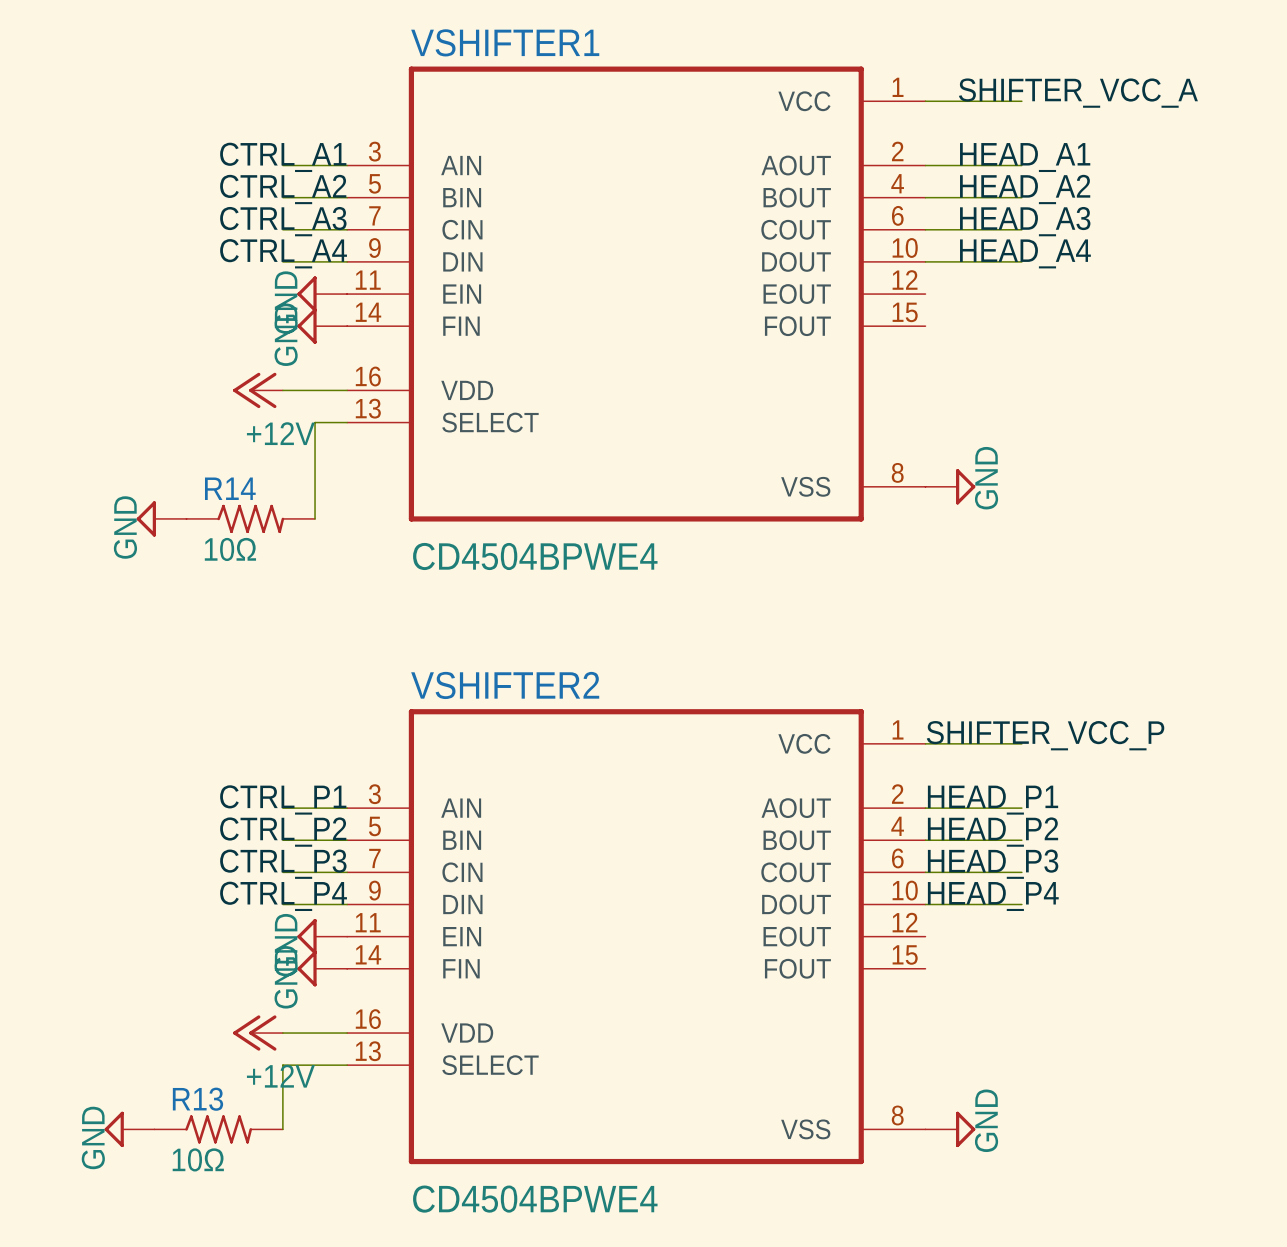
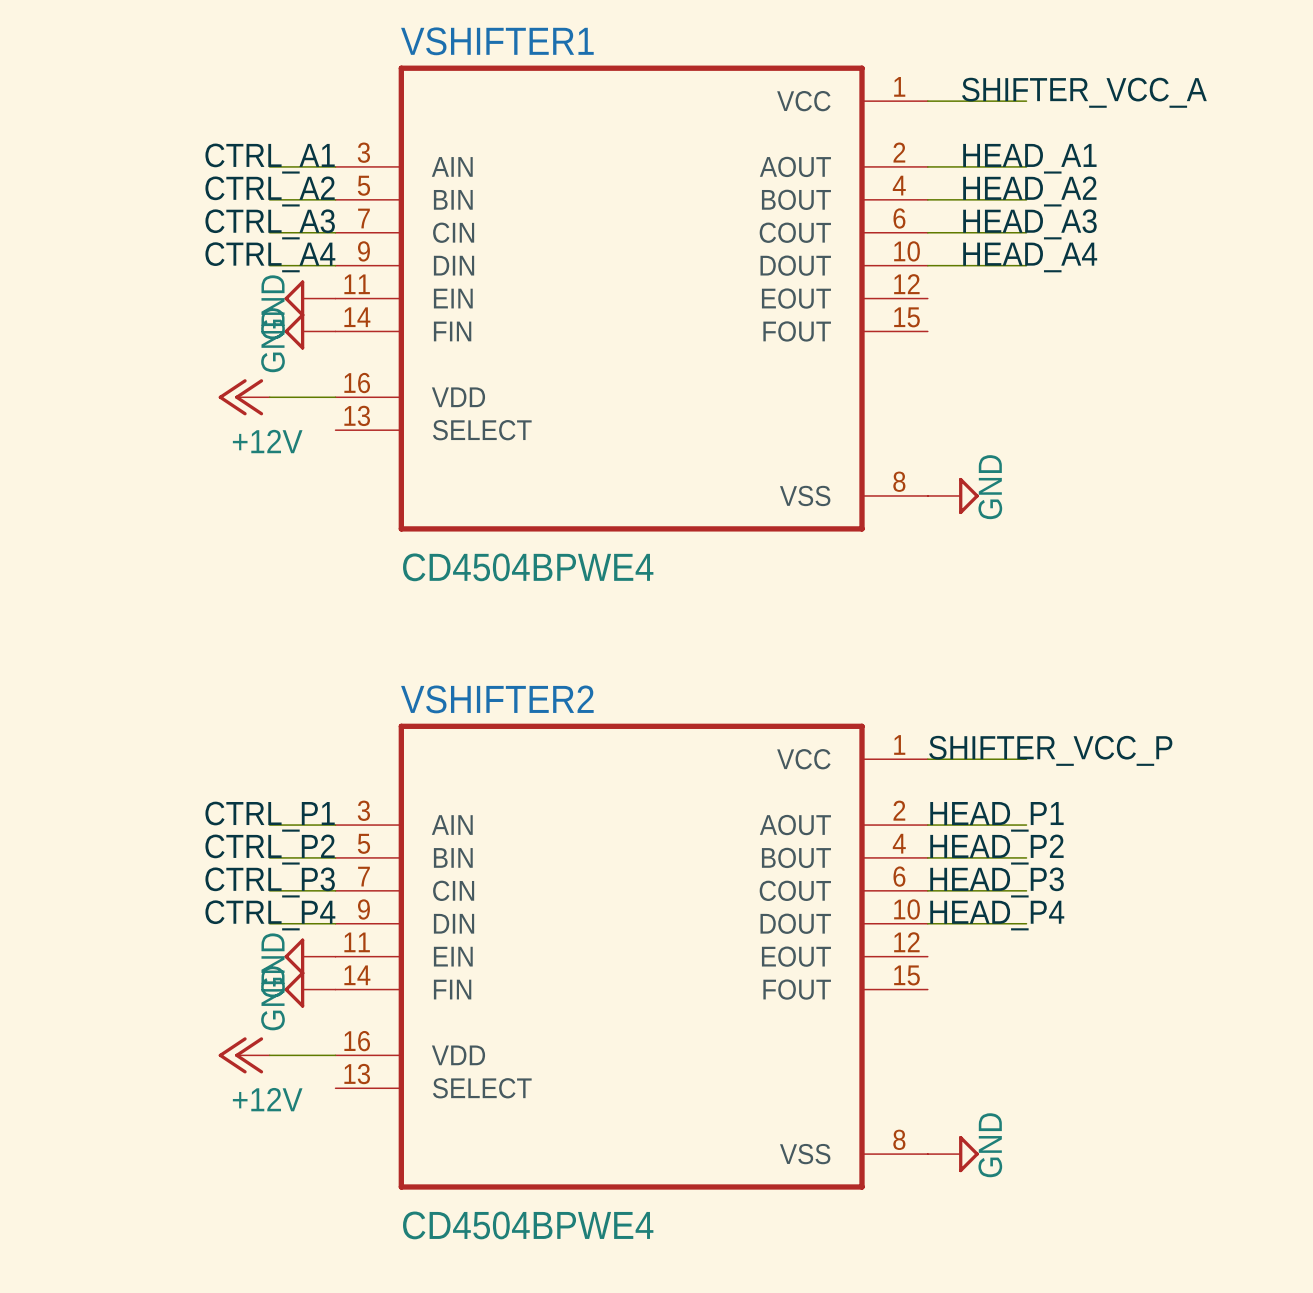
wire: (347, 422) (315, 422) (315, 518) -> none
power symbol: GND (161, 518) -> none
R14: 10Ω (250, 518) -> none
wire: (347, 1065) (282, 1065) (282, 1129) -> none
power symbol: GND (129, 1129) -> none
R13: 10Ω (218, 1129) -> none

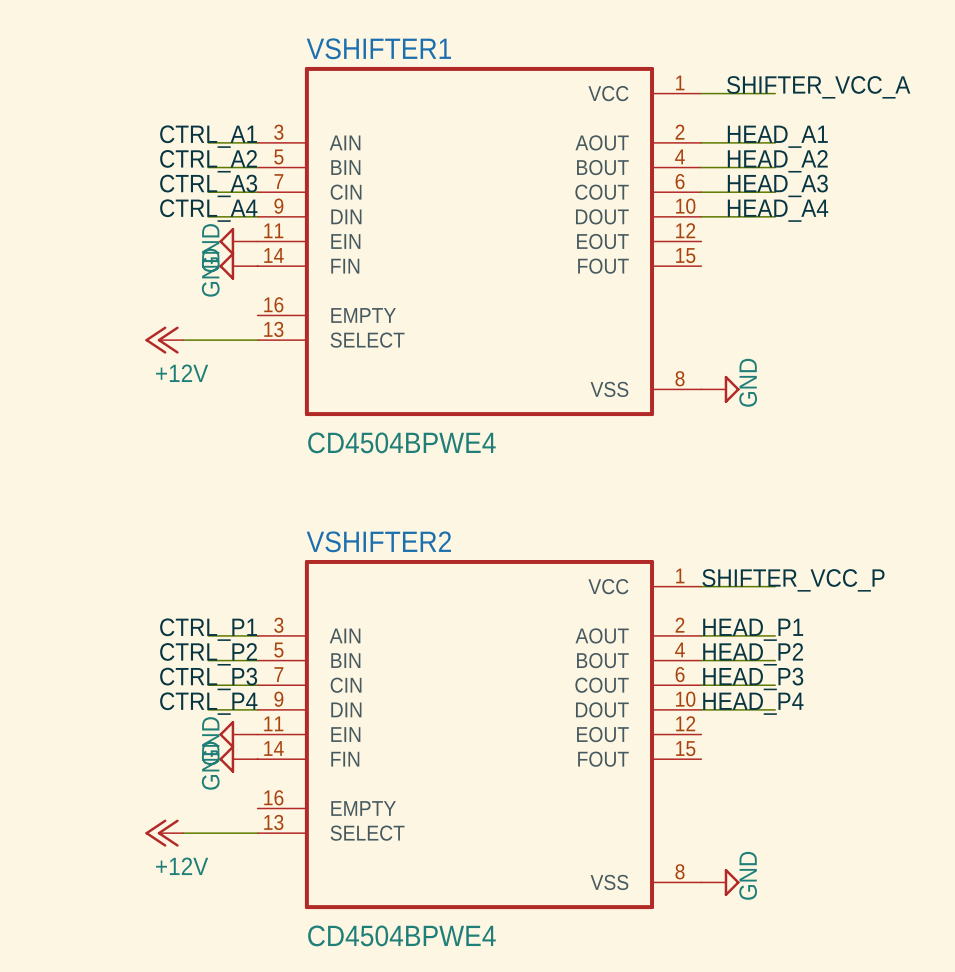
power symbol position: +12V (244, 397) -> +12V (164, 340)
wire: (269, 397) (335, 397) -> none
VSHIFTER1 pin name: VDD (458, 397) -> EMPTY (363, 315)
wire: none -> (183, 340) (257, 340)
power symbol position: +12V (244, 1055) -> +12V (164, 833)
wire: (269, 1055) (335, 1055) -> none
VSHIFTER2 pin name: VDD (458, 1055) -> EMPTY (363, 808)
wire: none -> (183, 833) (257, 833)

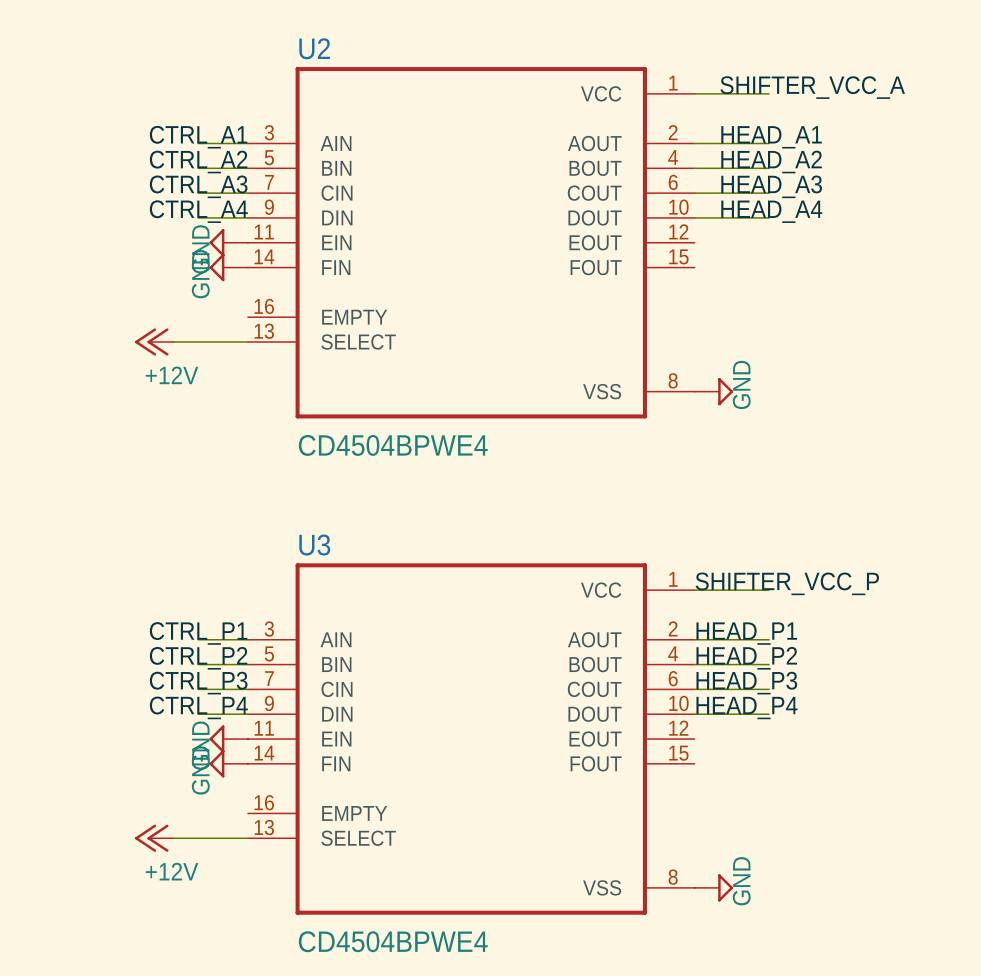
VSHIFTER1 name: VSHIFTER1 (378, 48) -> U2 (314, 48)
VSHIFTER2 name: VSHIFTER2 (378, 541) -> U3 (314, 545)

